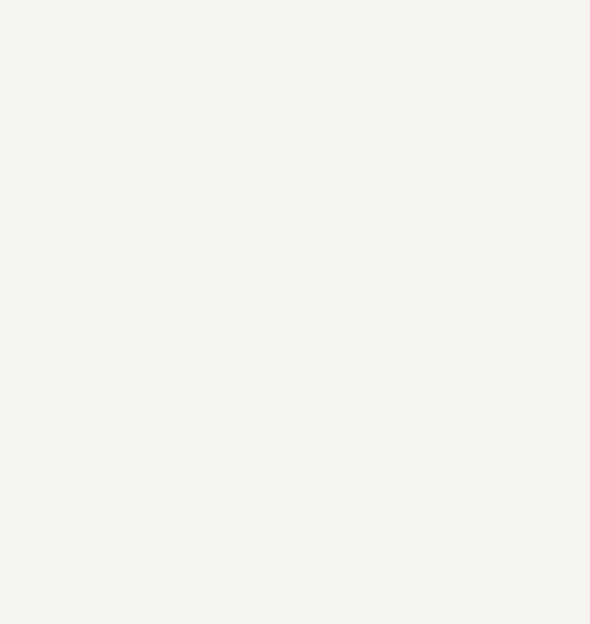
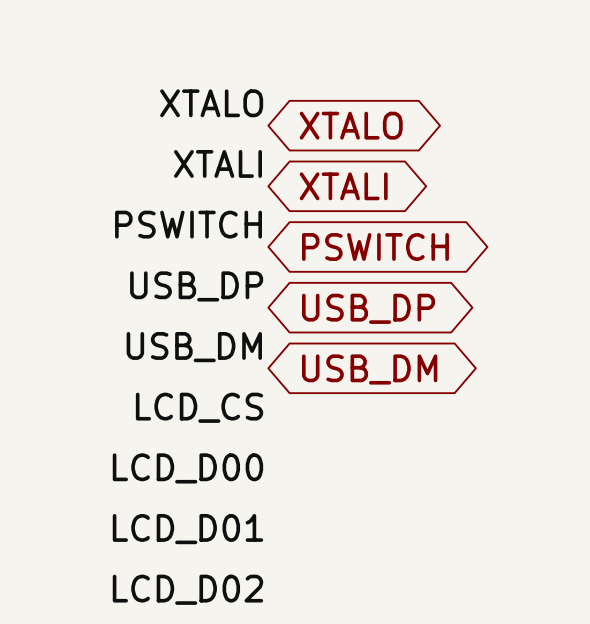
label: none -> XTALO (211, 103)
global label: none -> XTALO (351, 125)
label: none -> XTALI (218, 163)
global label: none -> XTALI (343, 186)
label: none -> PSWITCH (188, 224)
global label: none -> PSWITCH (375, 246)
label: none -> USB_DP (196, 286)
global label: none -> USB_DP (368, 308)
label: none -> USB_DM (194, 347)
global label: none -> USB_DM (369, 369)
label: none -> LCD_CS (199, 407)
label: none -> LCD_D00 (187, 468)
label: none -> LCD_D01 (187, 529)
label: none -> LCD_D02 (187, 589)

